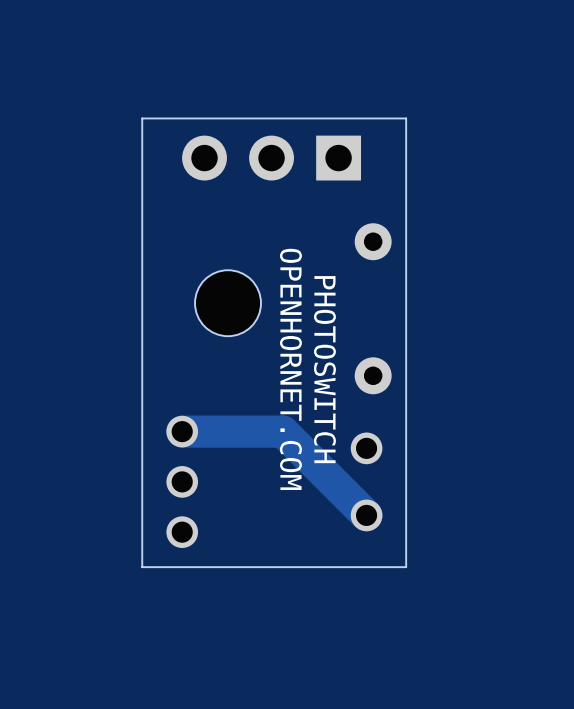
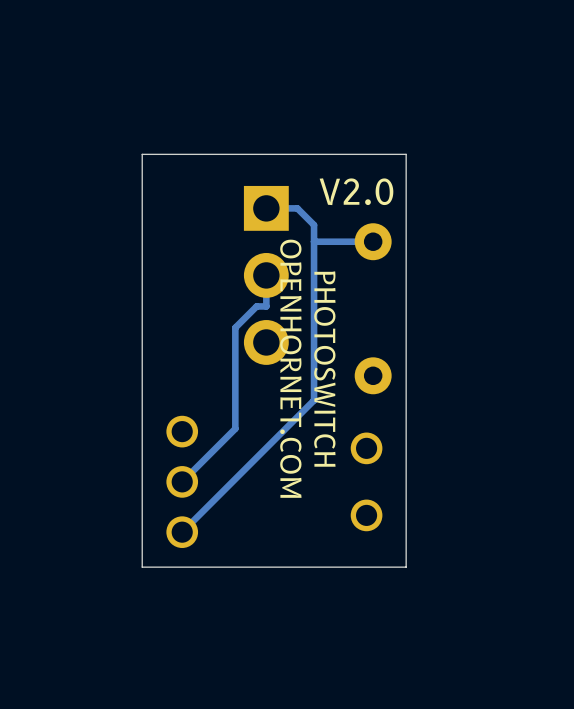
board edge: (406, 154) (406, 118) (142, 118) (142, 154) -> (406, 154) (142, 154)
part rotation: 0° (271, 158) -> 90° counterclockwise (266, 275)
part position: (271, 158) -> (266, 275)
text: none -> V2.0 (356, 191)
track: none -> (266, 208) (297, 208) (314, 225) (314, 400) (182, 532)
track: none -> (373, 241) (314, 241)
track: none -> (266, 275) (266, 306) (256, 306) (235, 327) (235, 428) (182, 481)
part: (228, 303) -> none
track: (182, 431) (282, 431) (366, 515) -> none

